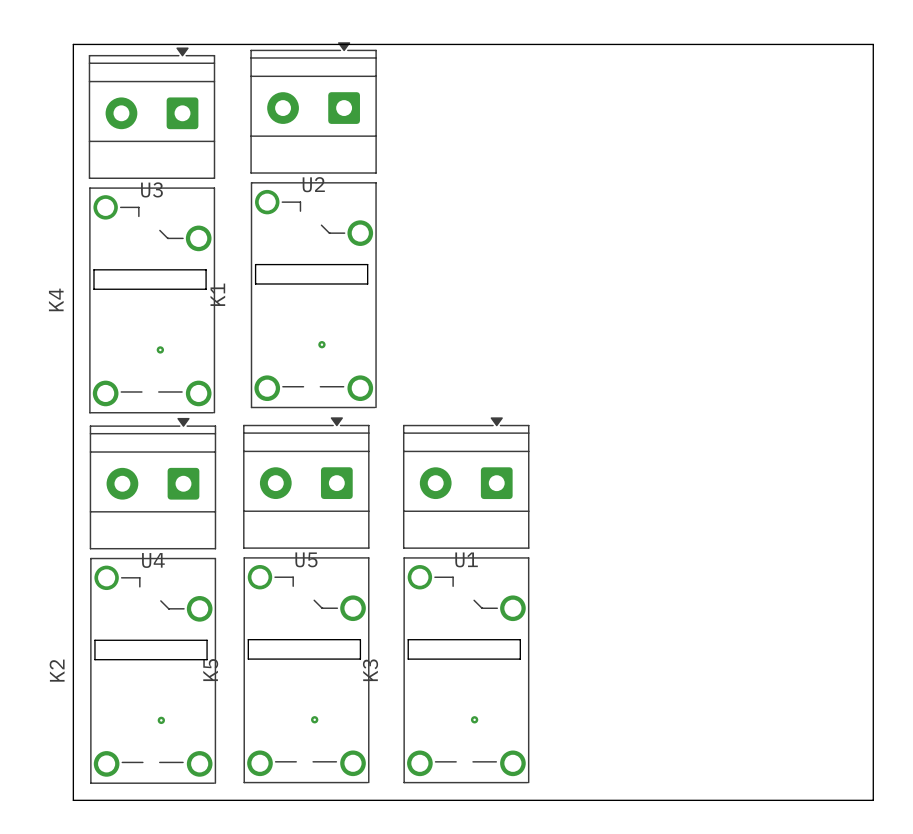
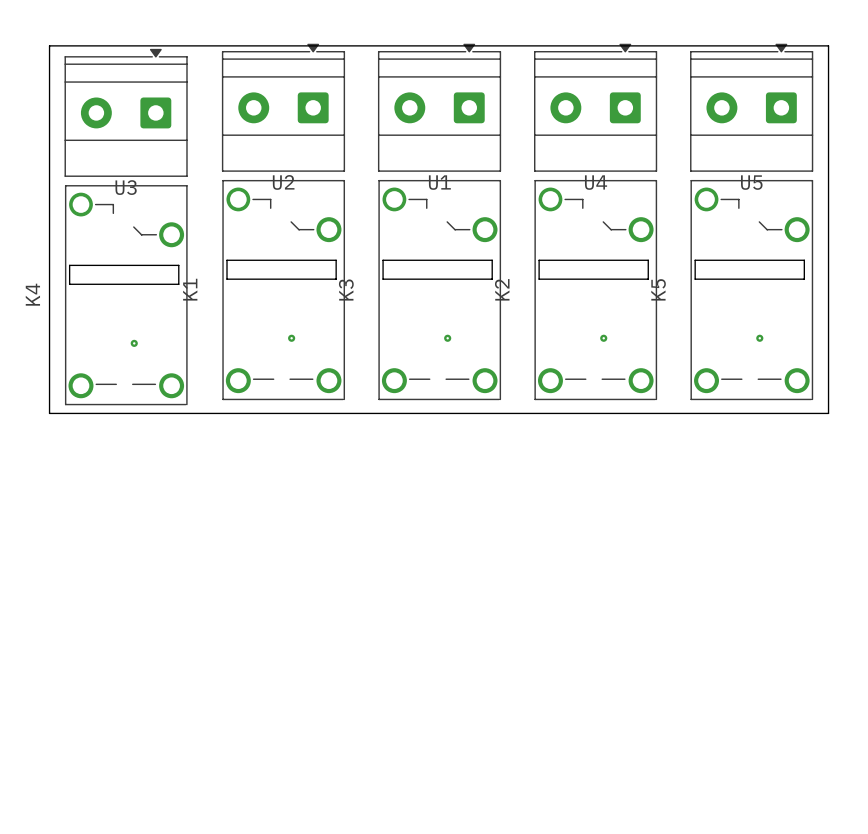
board edge: none -> (383, 260) (492, 260) (492, 279) (383, 279) (383, 260)
board edge: none -> (539, 260) (648, 260) (648, 279) (539, 279) (539, 260)
board edge: none -> (695, 260) (804, 260) (804, 279) (695, 279) (695, 260)
via: none -> (447, 338)
via: none -> (603, 338)
via: none -> (759, 338)
board edge: (73, 421) (73, 800) (873, 800) (873, 421) -> (49, 413) (828, 413)
U4 position: (152, 483) -> (595, 107)
U5 position: (306, 483) -> (751, 107)
U1 position: (466, 483) -> (439, 107)
board edge: (248, 639) (360, 639) (360, 659) (248, 659) (248, 639) -> none
board edge: (408, 639) (520, 639) (520, 659) (408, 659) (408, 639) -> none
board edge: (94, 640) (207, 640) (207, 659) (94, 659) (94, 640) -> none
K2 position: (153, 670) -> (595, 290)
K5 position: (306, 670) -> (751, 290)
K3 position: (466, 670) -> (439, 290)
via: (314, 719) -> none
via: (474, 719) -> none
via: (161, 720) -> none

